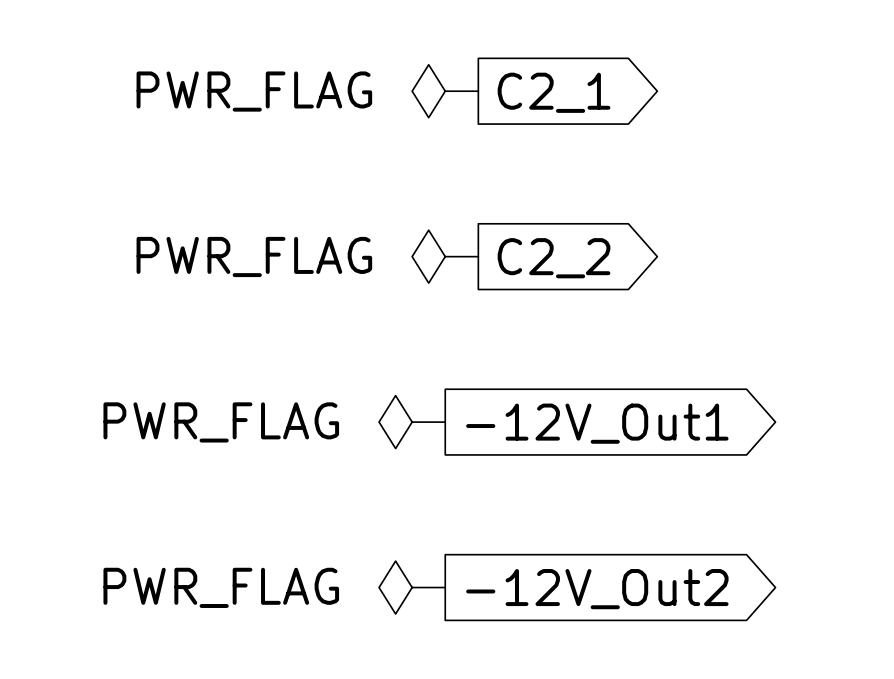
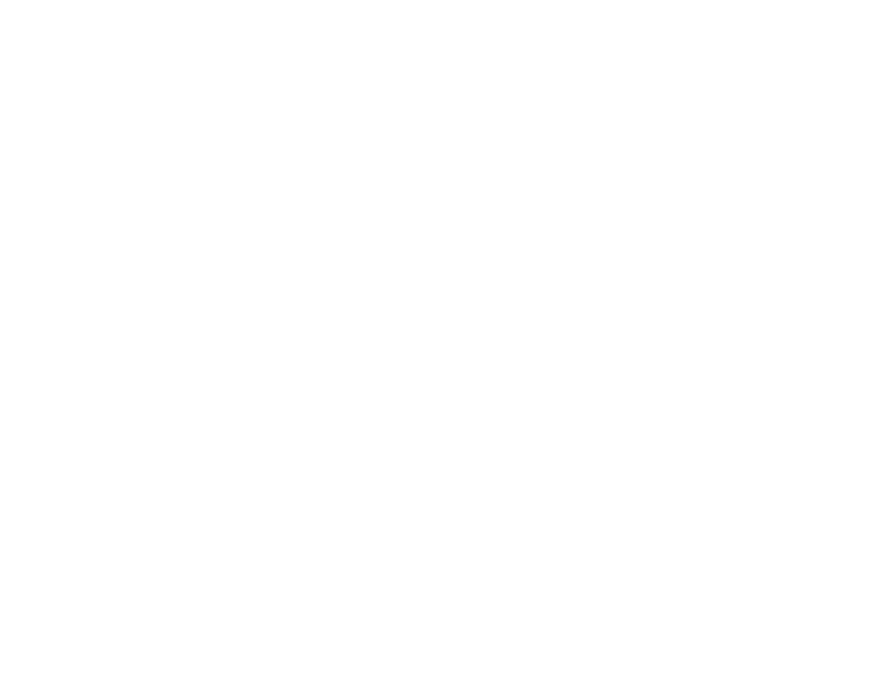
power symbol: PWR_FLAG (445, 91) -> none
global label: C2_1 (554, 92) -> none
power symbol: PWR_FLAG (445, 256) -> none
global label: C2_2 (554, 258) -> none
power symbol: PWR_FLAG (412, 422) -> none
global label: -12V_Out1 (597, 423) -> none
power symbol: PWR_FLAG (412, 587) -> none
global label: -12V_Out2 (597, 589) -> none

